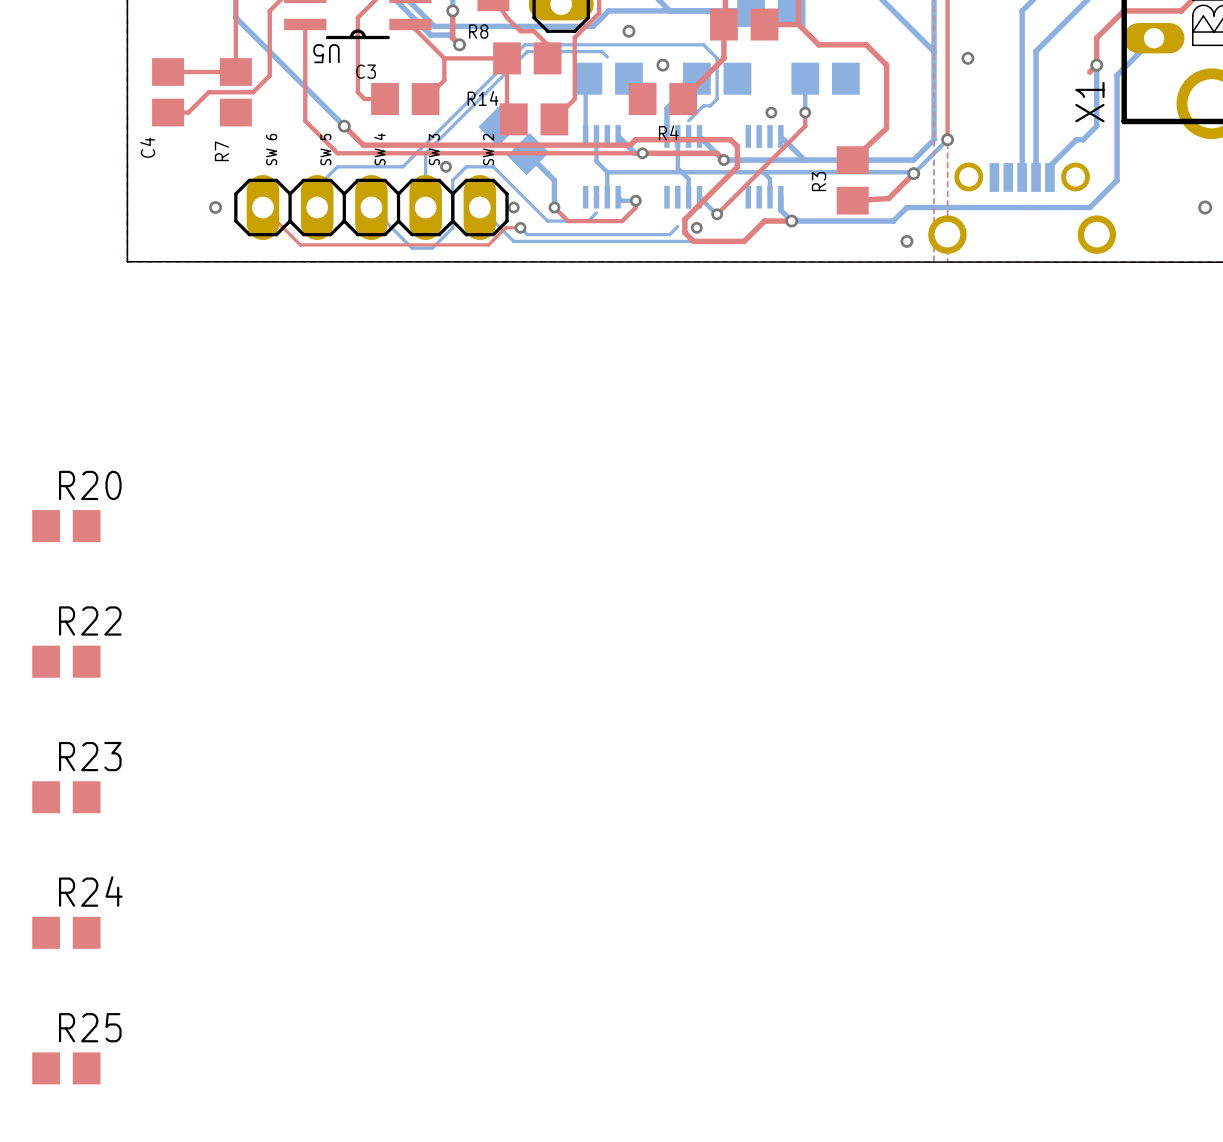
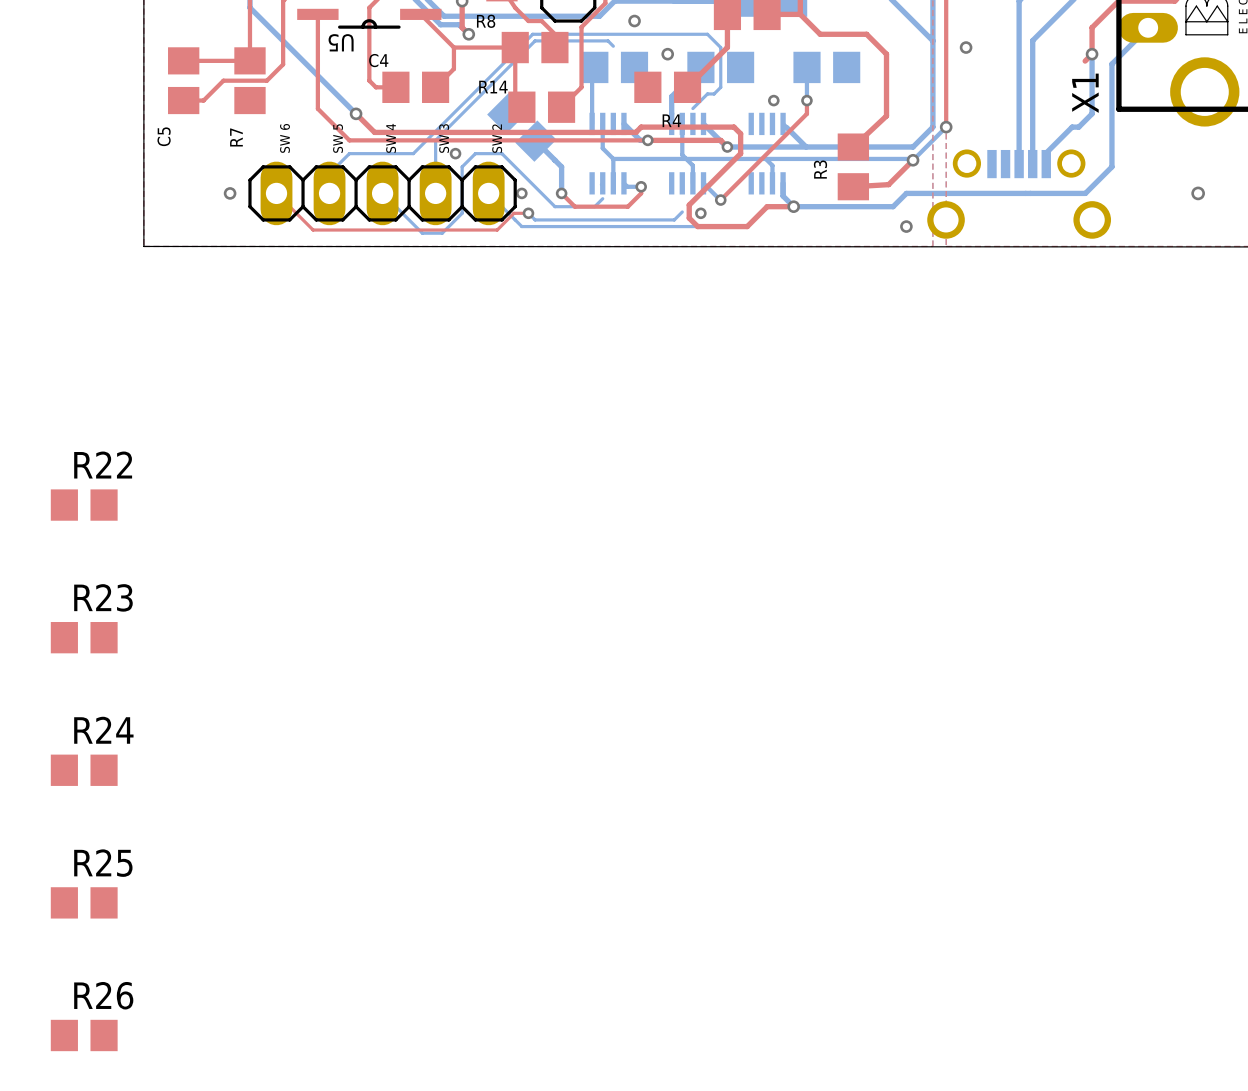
C3 name: C3 (366, 71) -> C4 (378, 60)
C4 name: C4 (147, 147) -> C5 (164, 136)
R20 name: R20 (90, 485) -> R22 (103, 465)
R22 name: R22 (90, 620) -> R23 (103, 597)
R23 name: R23 (90, 756) -> R24 (103, 730)
R24 name: R24 (90, 891) -> R25 (103, 863)
R25 name: R25 (90, 1027) -> R26 (103, 995)

